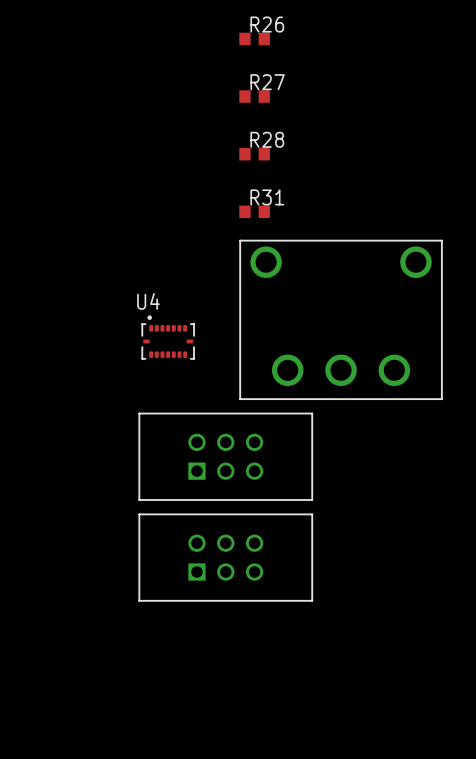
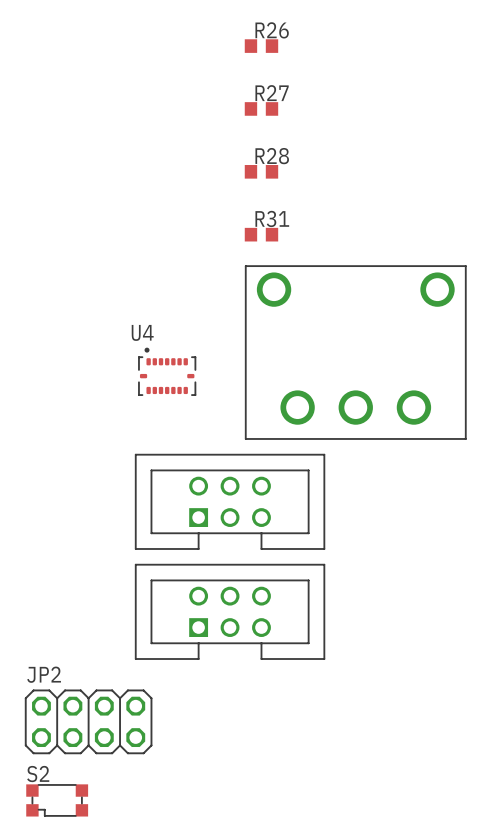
part footprint: [138, 412, 313, 501] -> [134, 453, 326, 550]
part footprint: [138, 513, 313, 602] -> [134, 563, 326, 660]
JP2: none -> (88, 721)
S2: none -> (57, 800)

